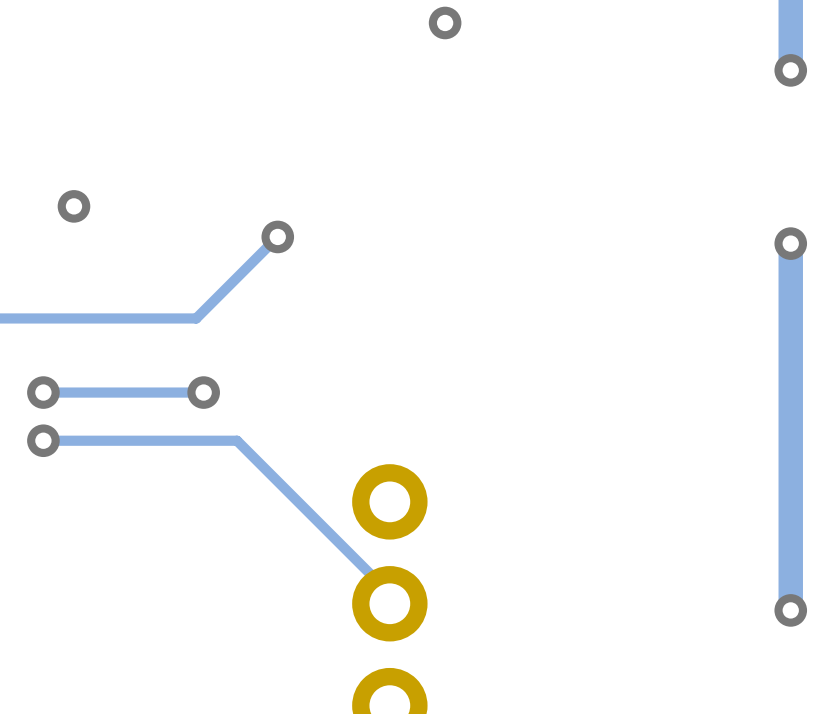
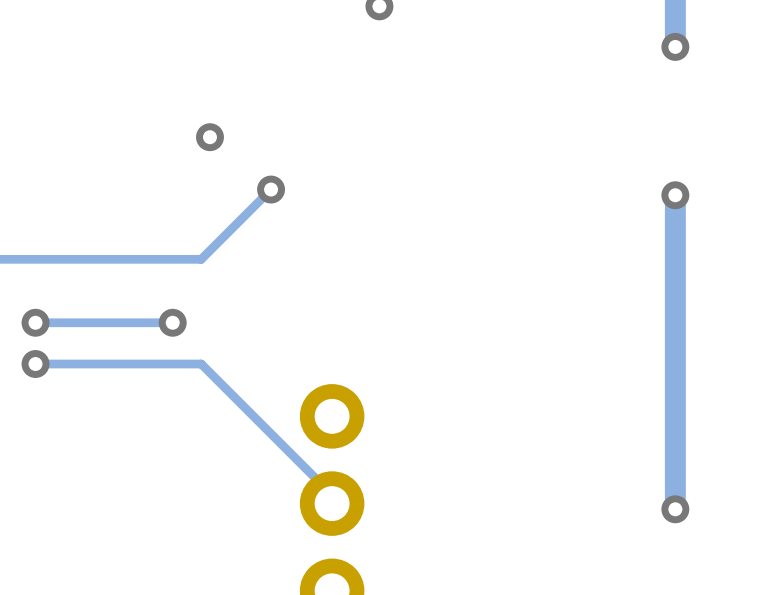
via: none -> (209, 137)
via: (73, 206) -> none
track: (277, 236) (196, 318) -> (271, 189) (201, 259) (166, 259)
via: (277, 236) -> none
via: none -> (271, 189)

